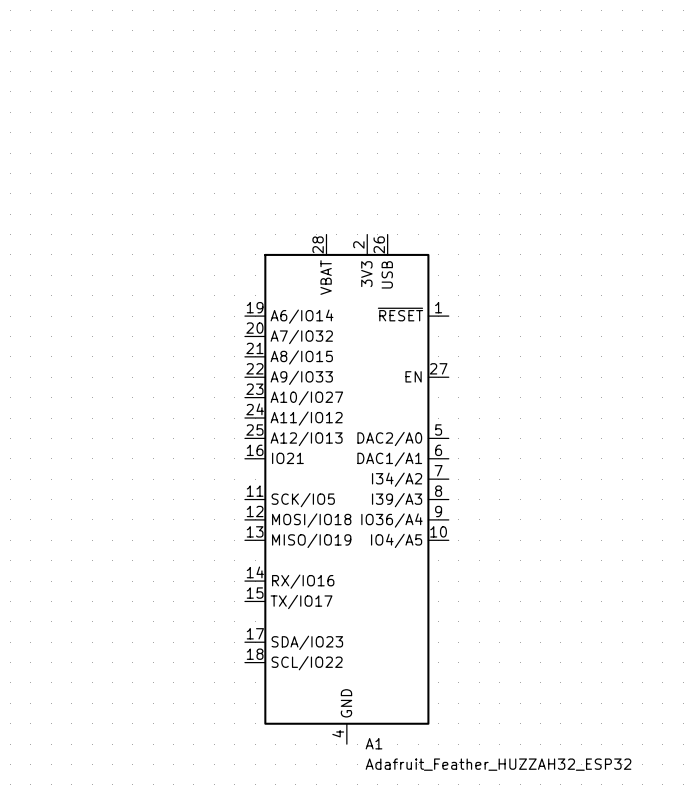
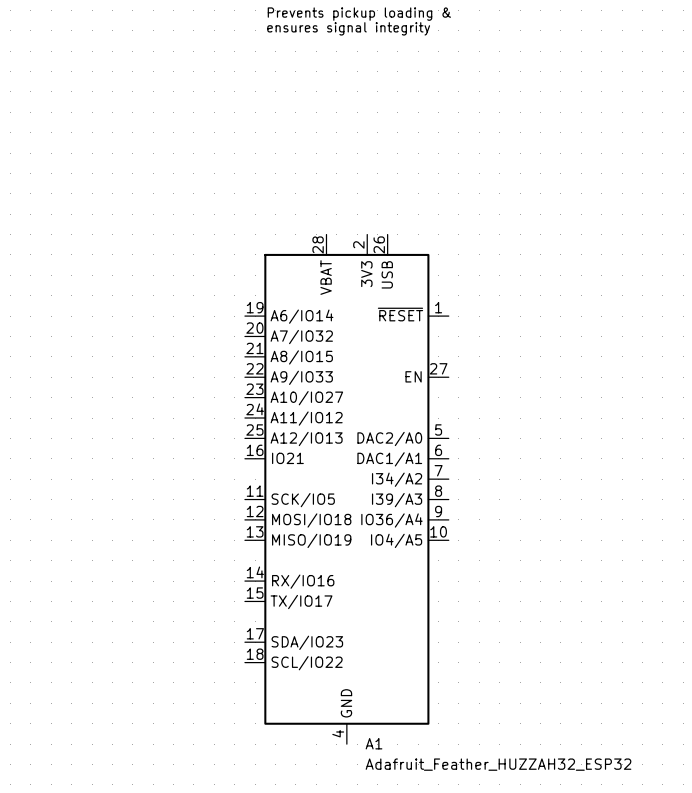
text: none -> Prevents pickup loading & (359, 14)
text: none -> ensures signal integrity (348, 28)

